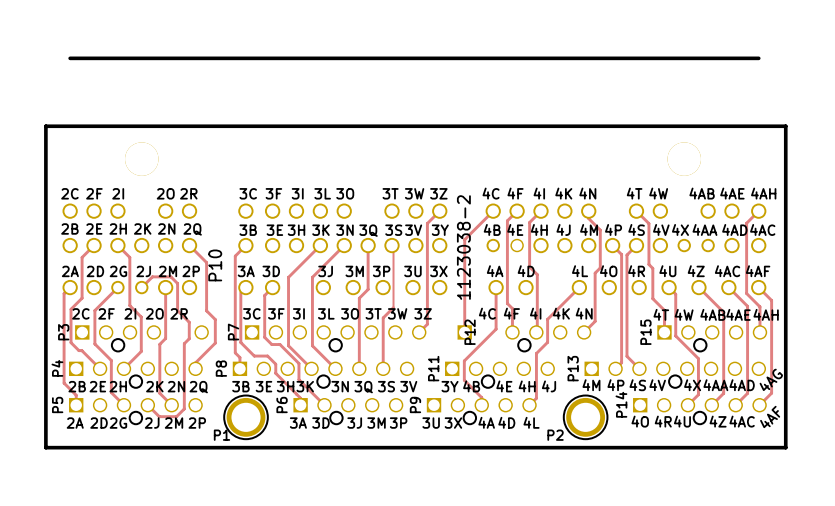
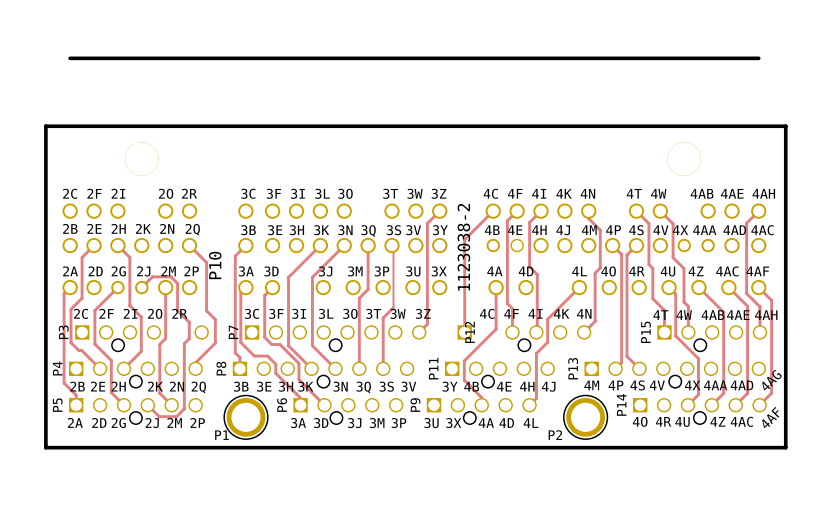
track: none -> (660, 211) (673, 223) (673, 257) (684, 268) (684, 302) (688, 306) (688, 332)

